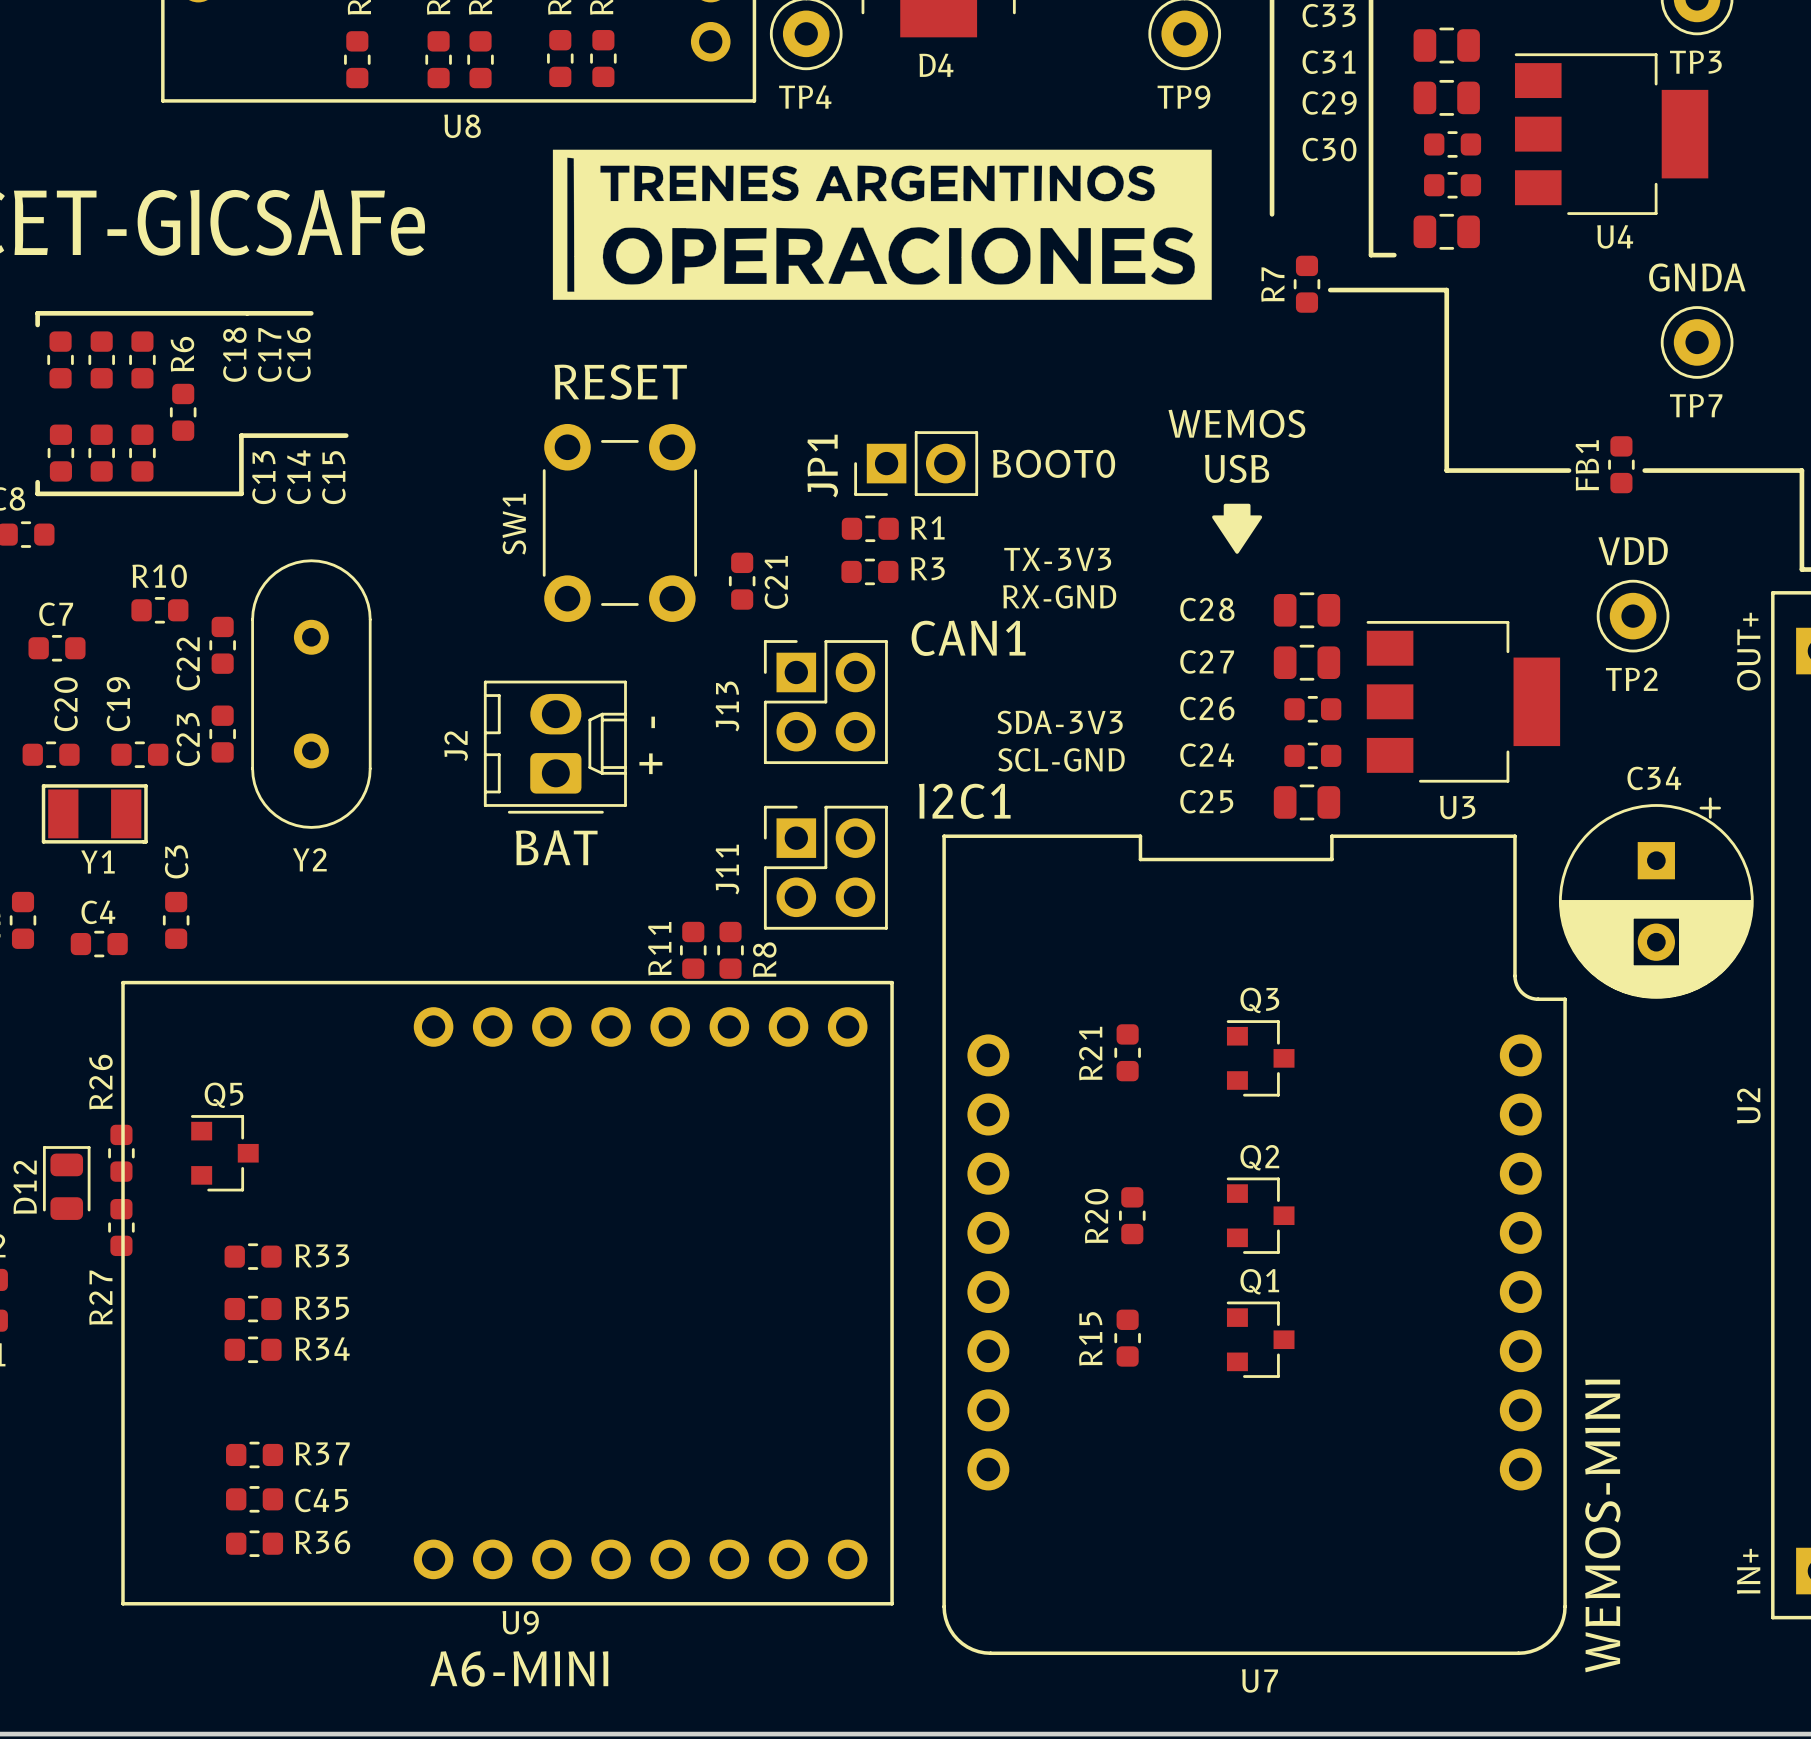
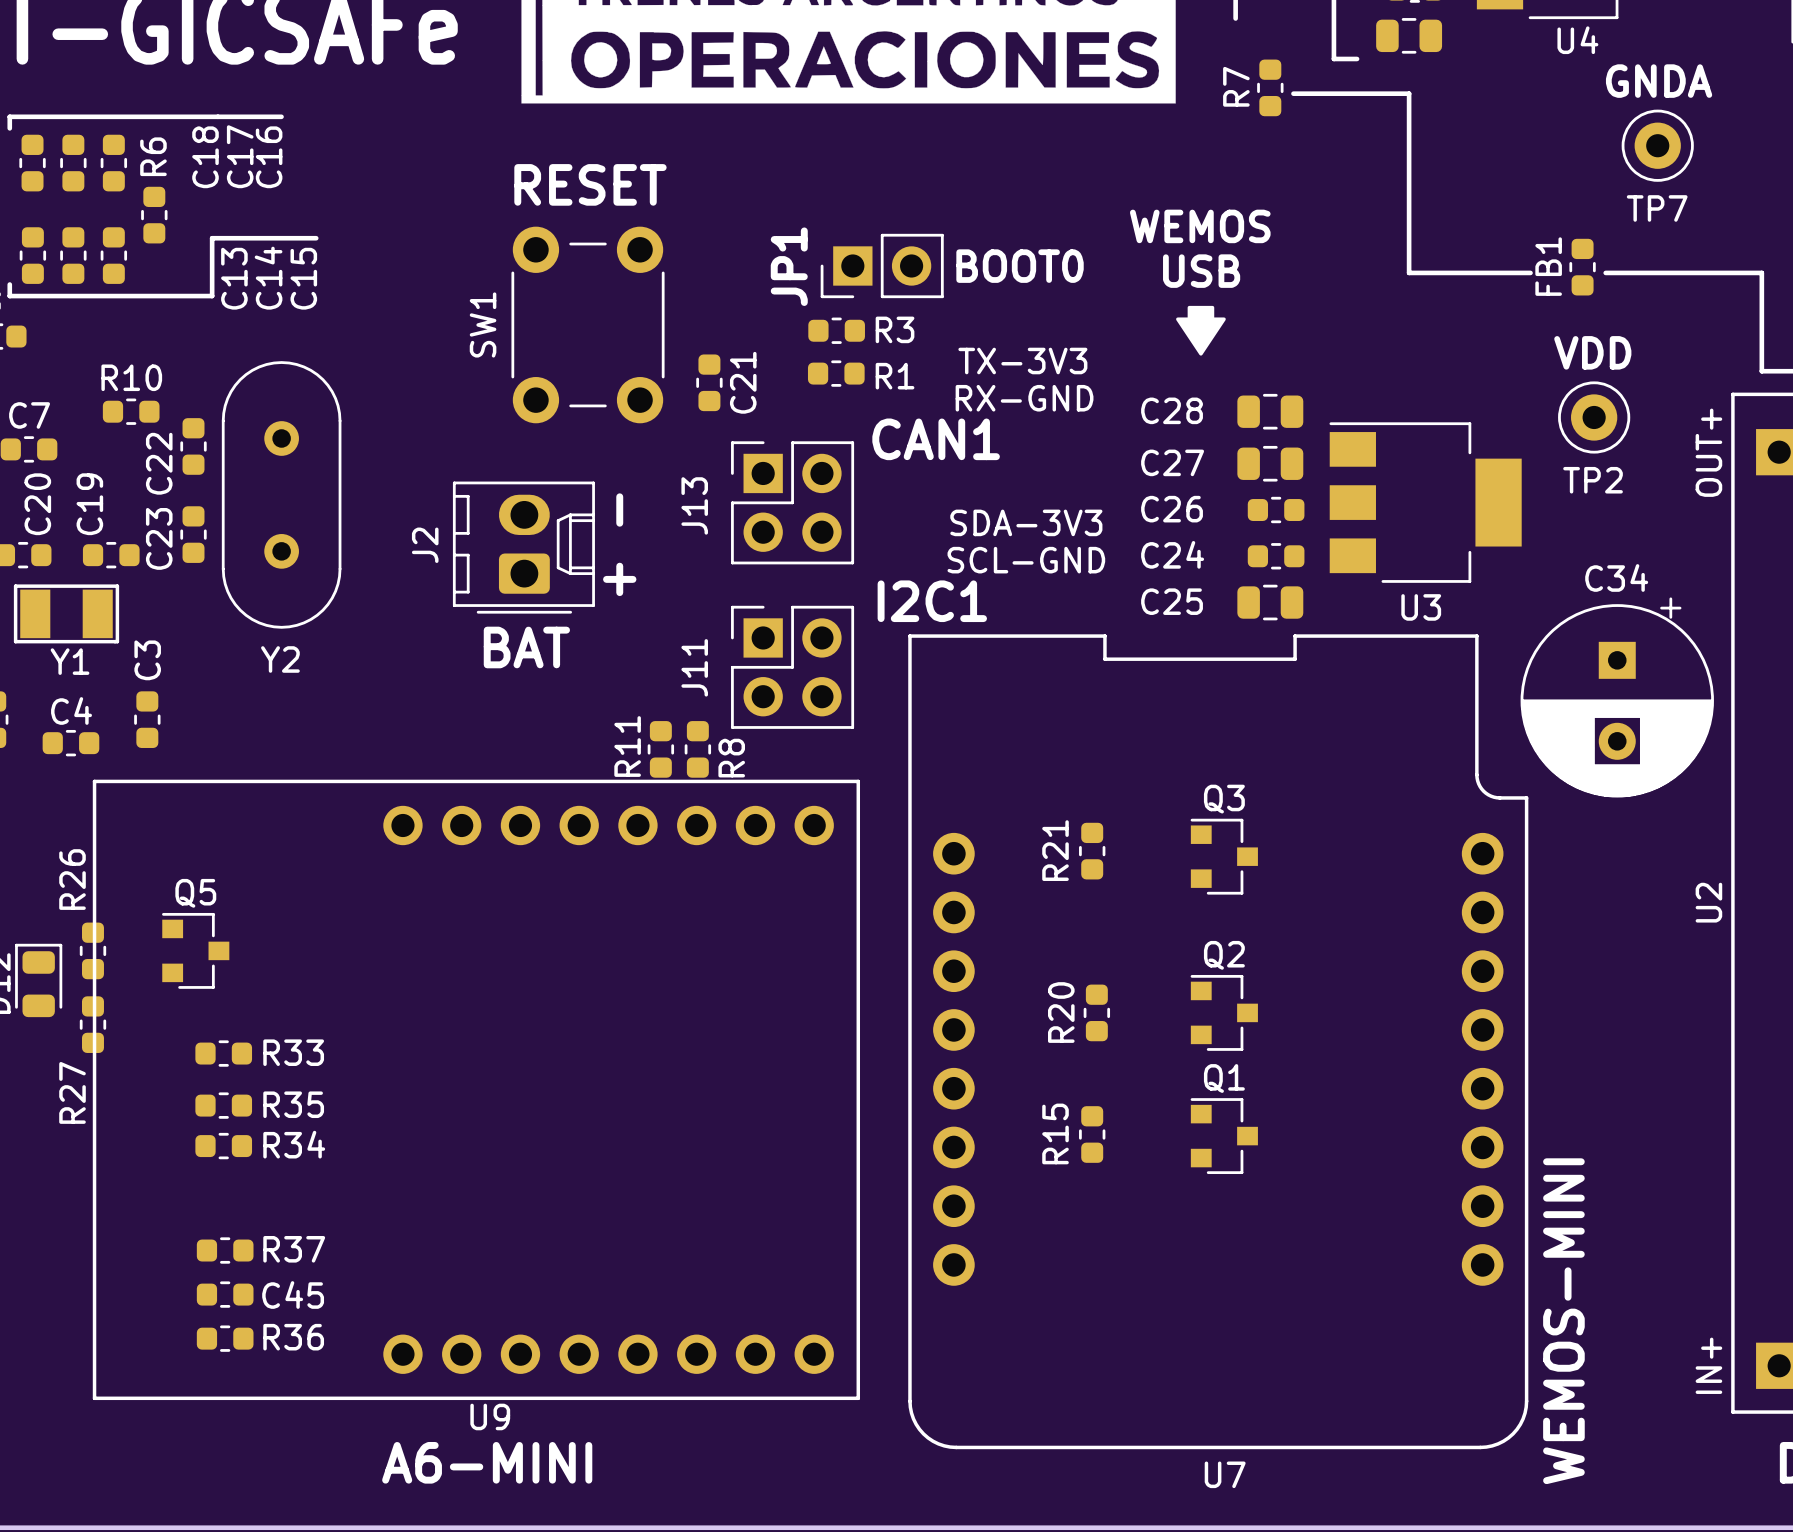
R1 name position: R1 (927, 527) -> R1 (895, 376)
R3 name position: R3 (927, 568) -> R3 (895, 329)

